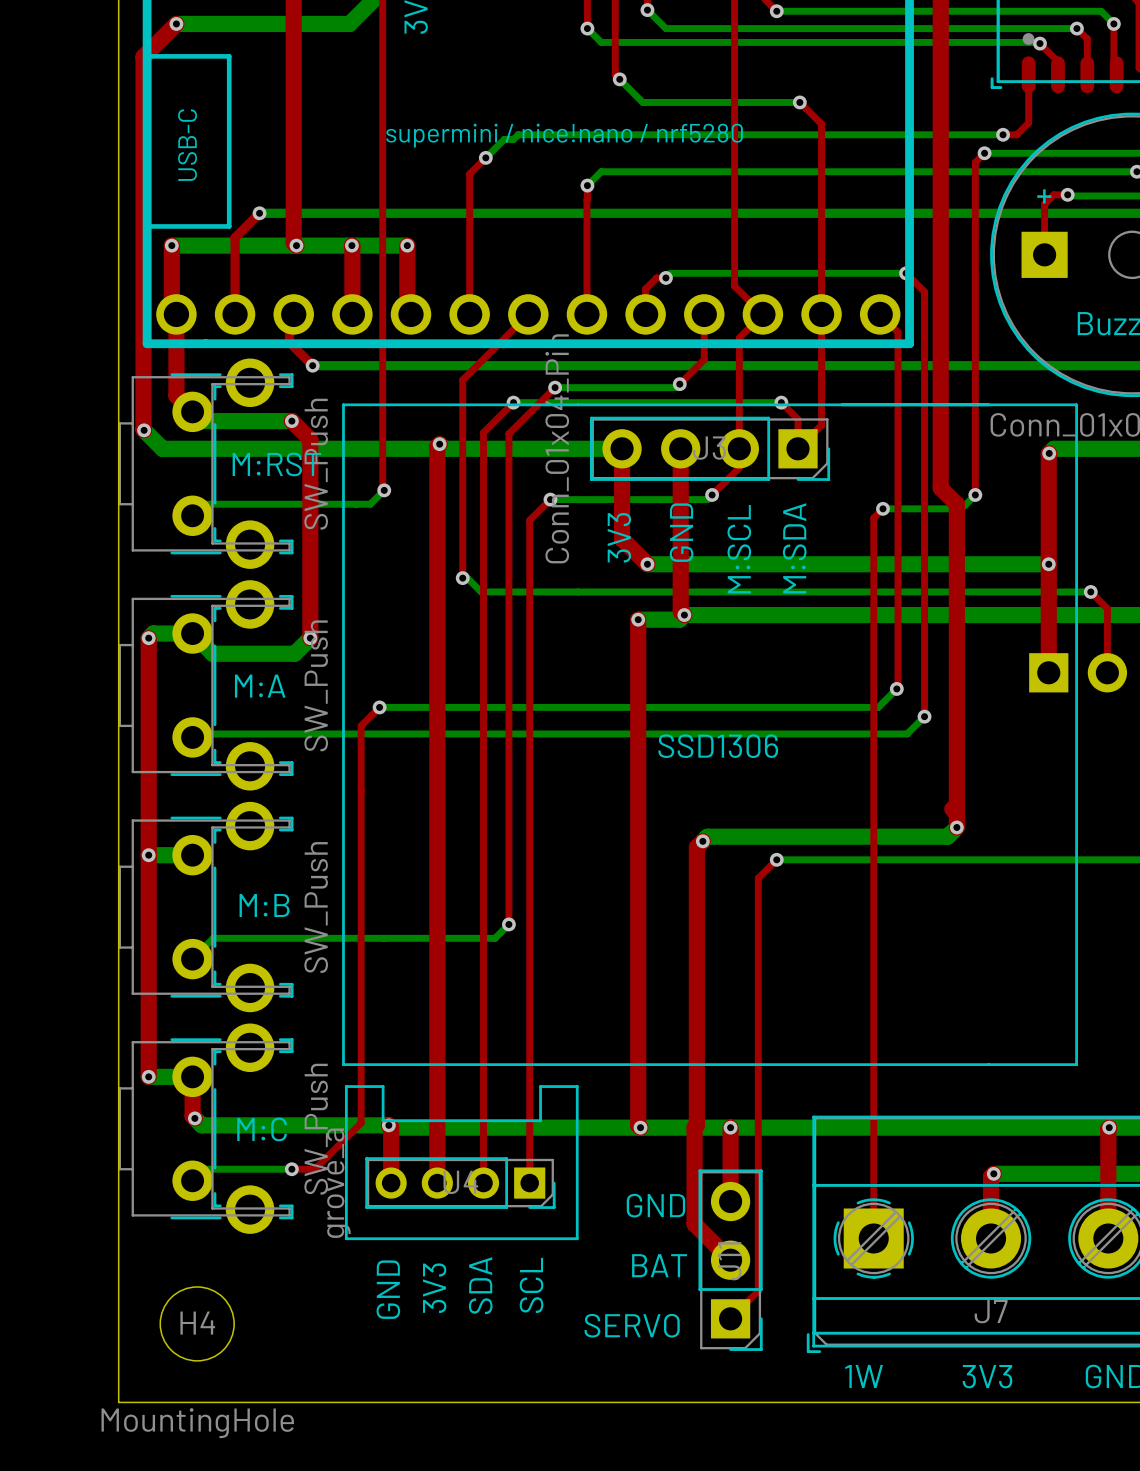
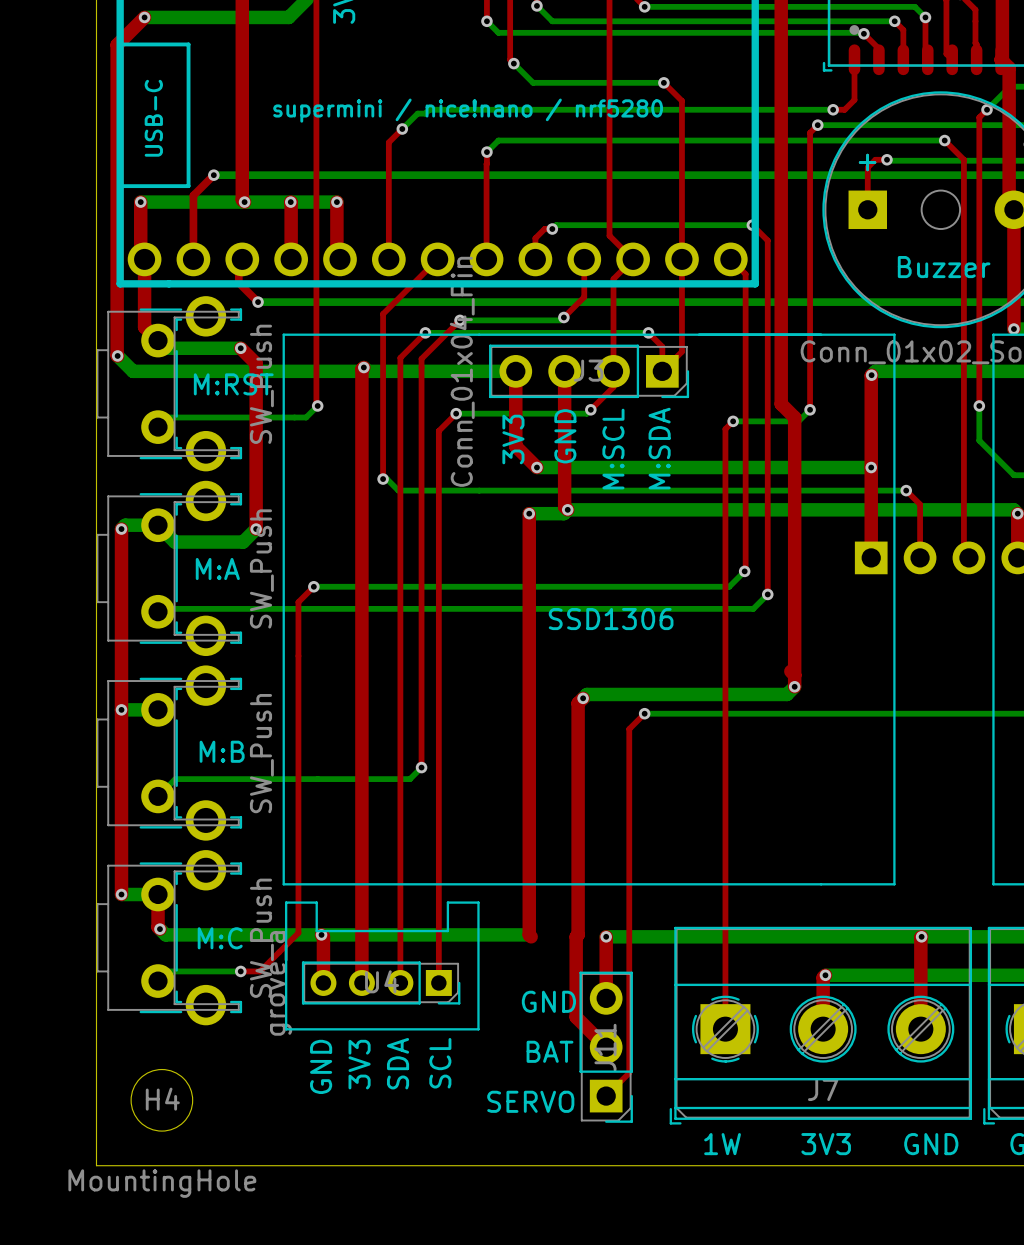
bottom track: (388, 1125) (391, 1127) (730, 1127) -> (321, 934) (529, 934)
via: (640, 1127) -> none

